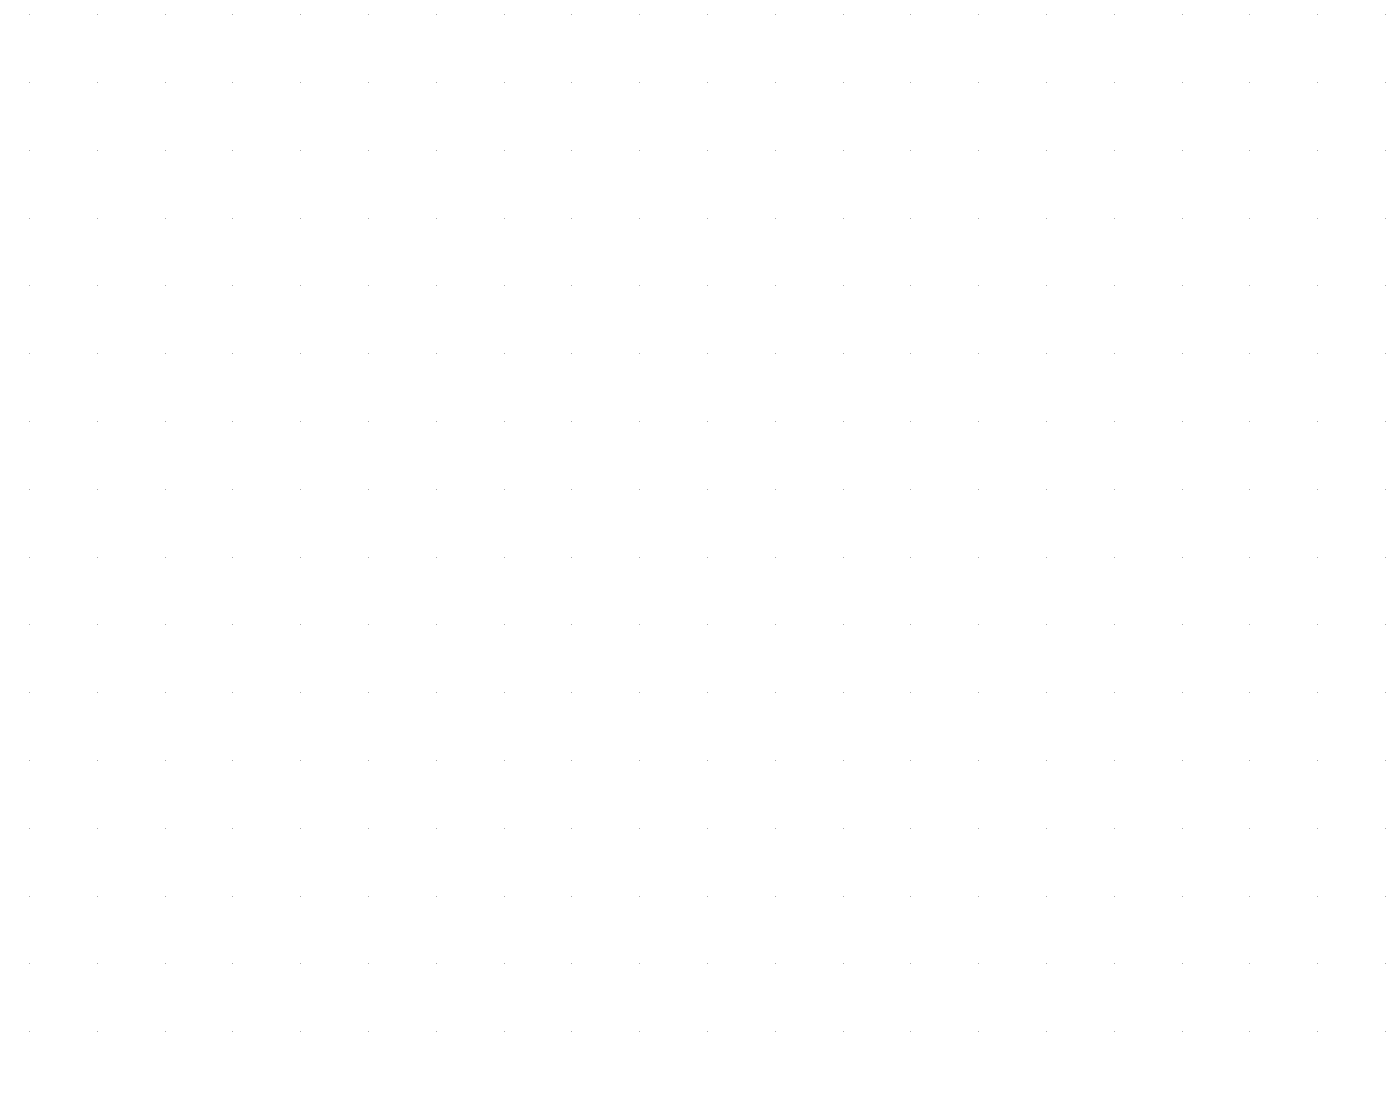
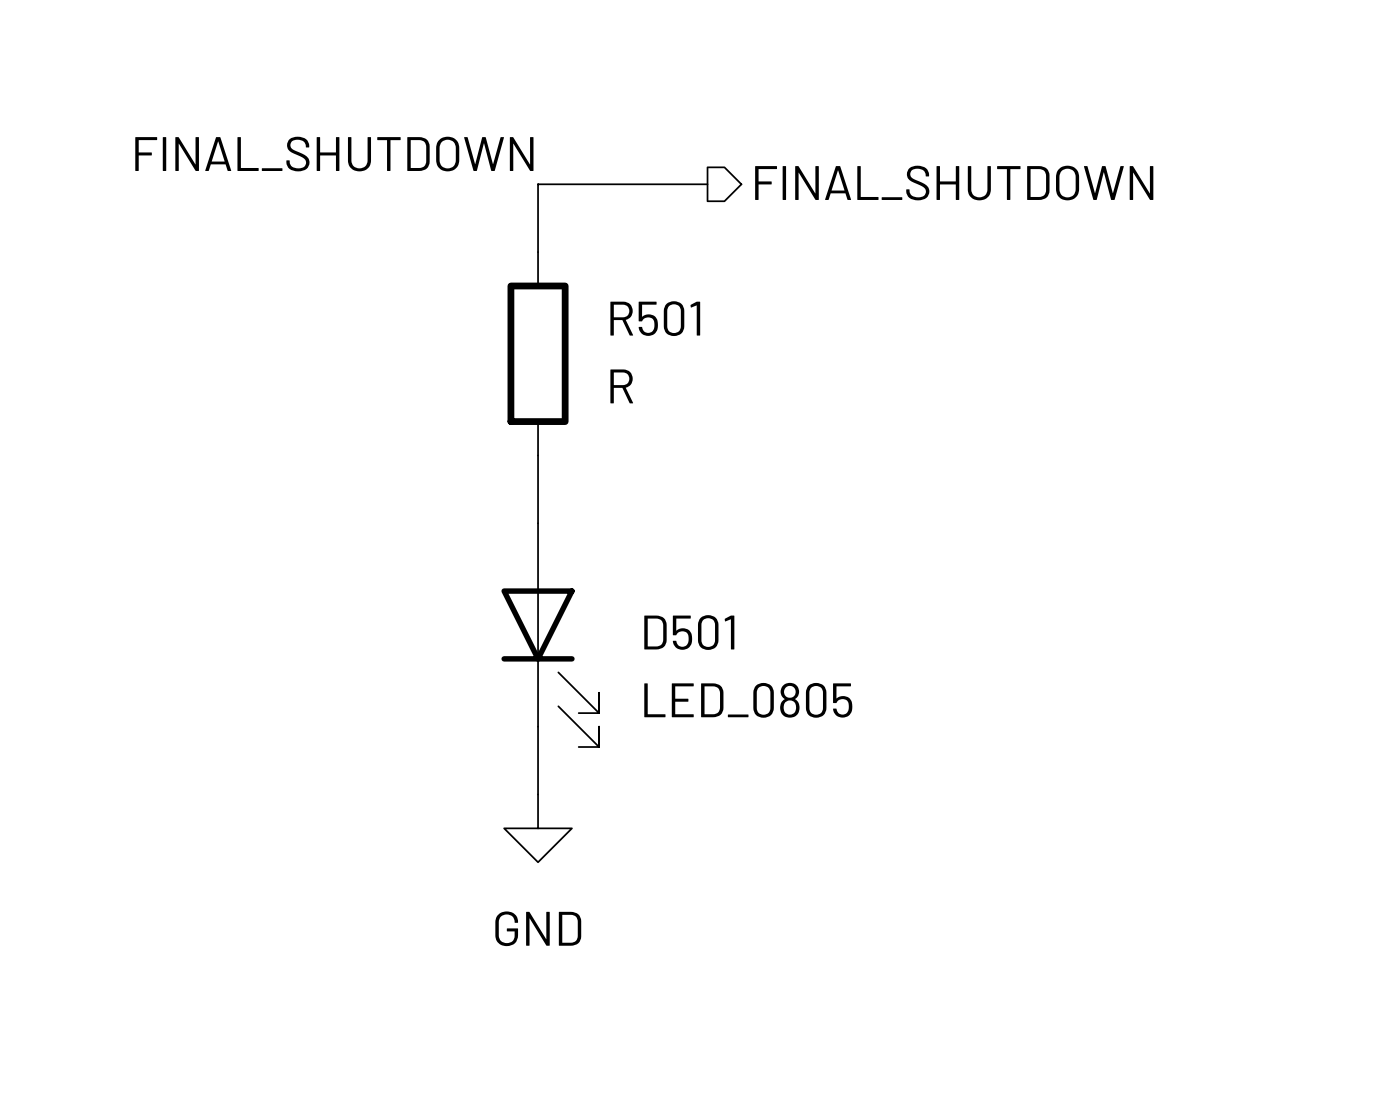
label: none -> FINAL_SHUTDOWN (334, 154)
wire: none -> (707, 184) (538, 184) (538, 252)
hierarchical label: none -> FINAL_SHUTDOWN (954, 183)
R501: none -> R (538, 353)
wire: none -> (538, 455) (538, 523)
D501: none -> LED_0805 (550, 635)
wire: none -> (538, 726) (538, 794)
power symbol: none -> GND (538, 828)

